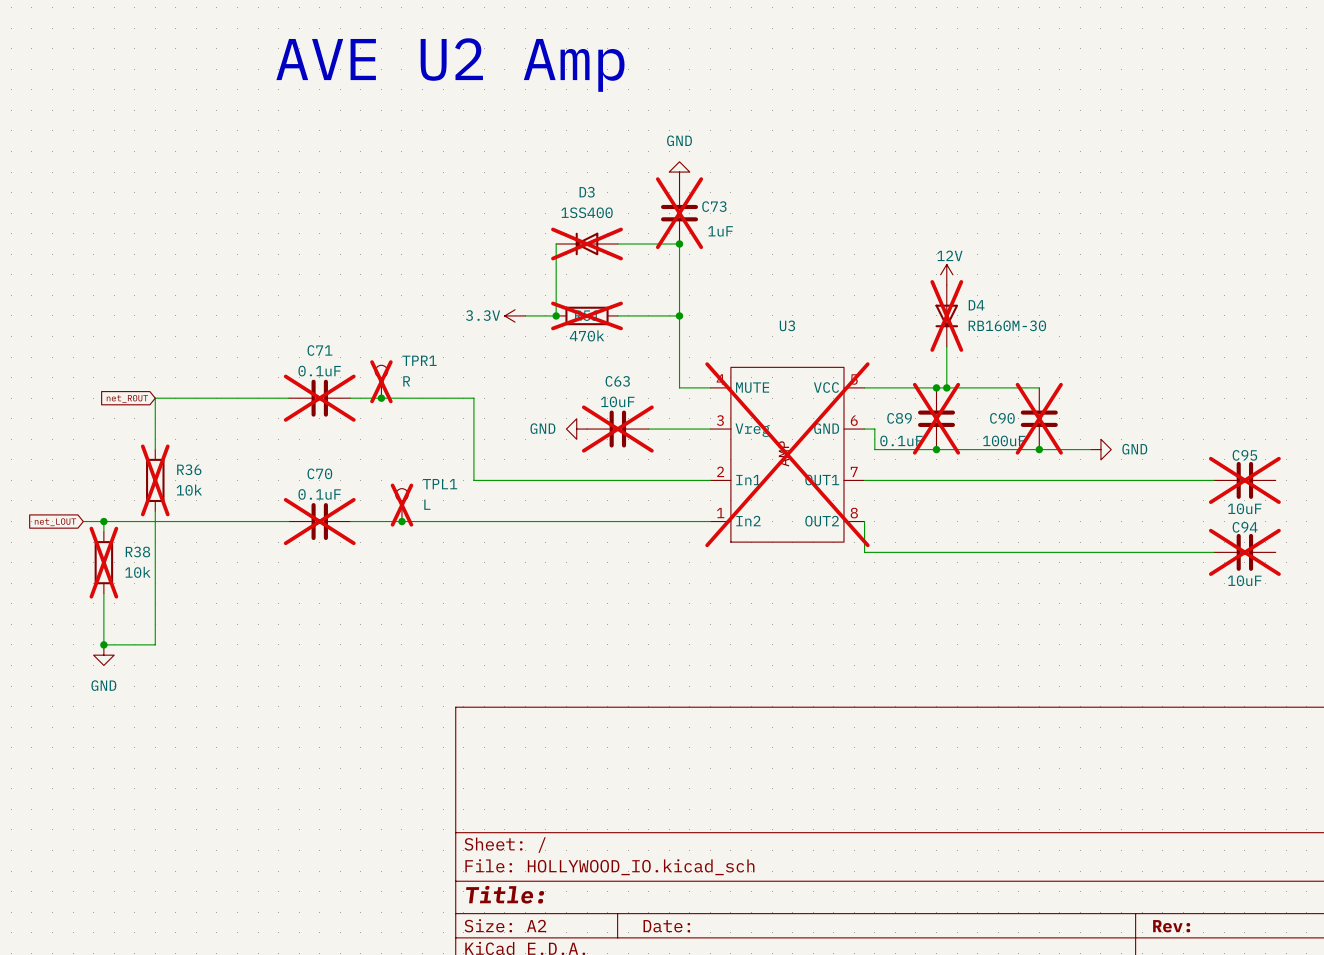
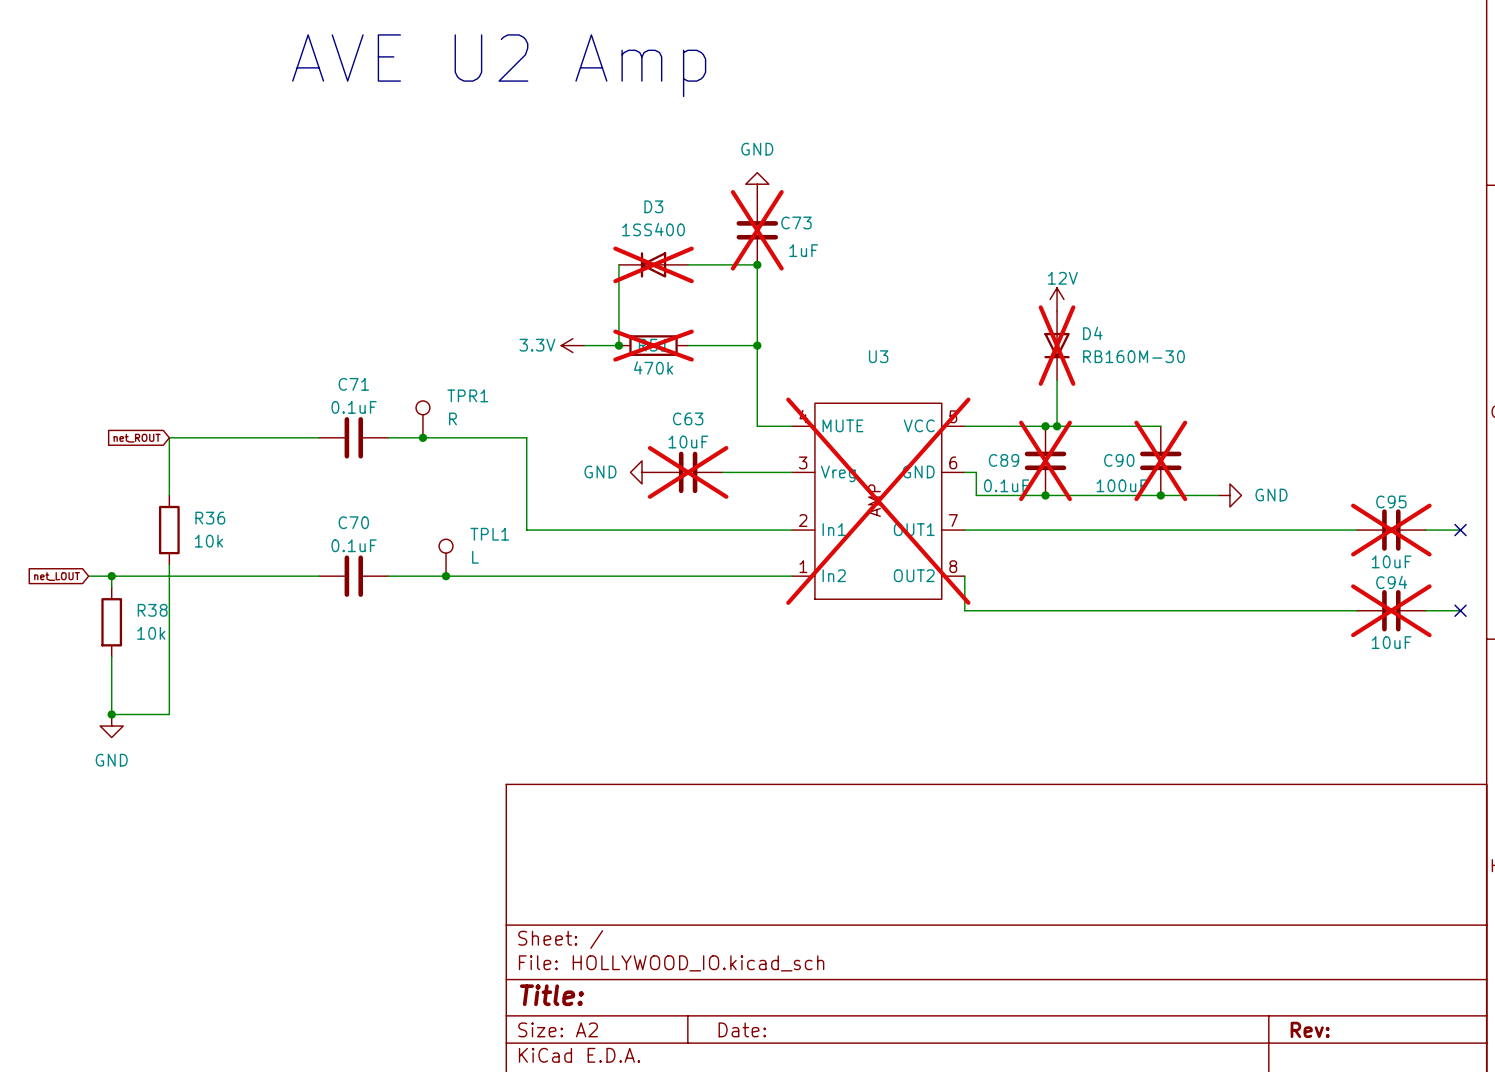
TPR1 do-not-place cross: (381, 381) -> none
C71 do-not-place cross: (319, 398) -> none
R36 do-not-place cross: (155, 480) -> none
wire: none -> (1425, 530) (1460, 530)
no-connect mark: none -> (1460, 530)
TPL1 do-not-place cross: (401, 505) -> none
C70 do-not-place cross: (319, 521) -> none
wire: none -> (1425, 610) (1460, 610)
no-connect mark: none -> (1460, 610)
R38 do-not-place cross: (103, 562) -> none

